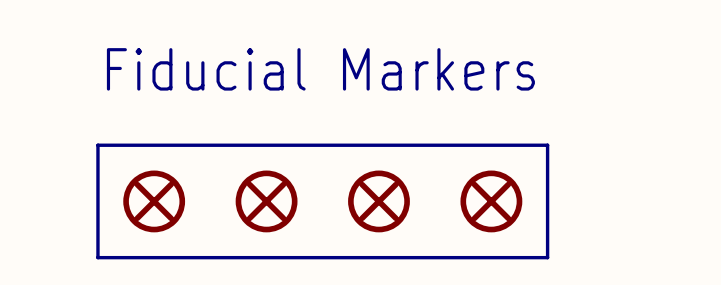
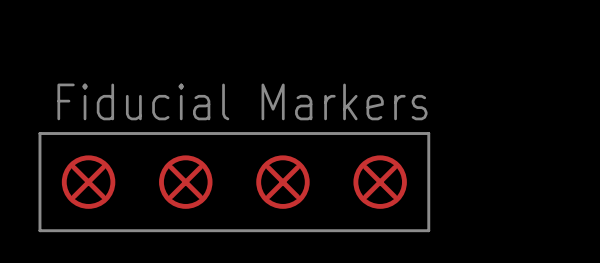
text position: Fiducial Markers (320, 69) -> Fiducial Markers (242, 101)

